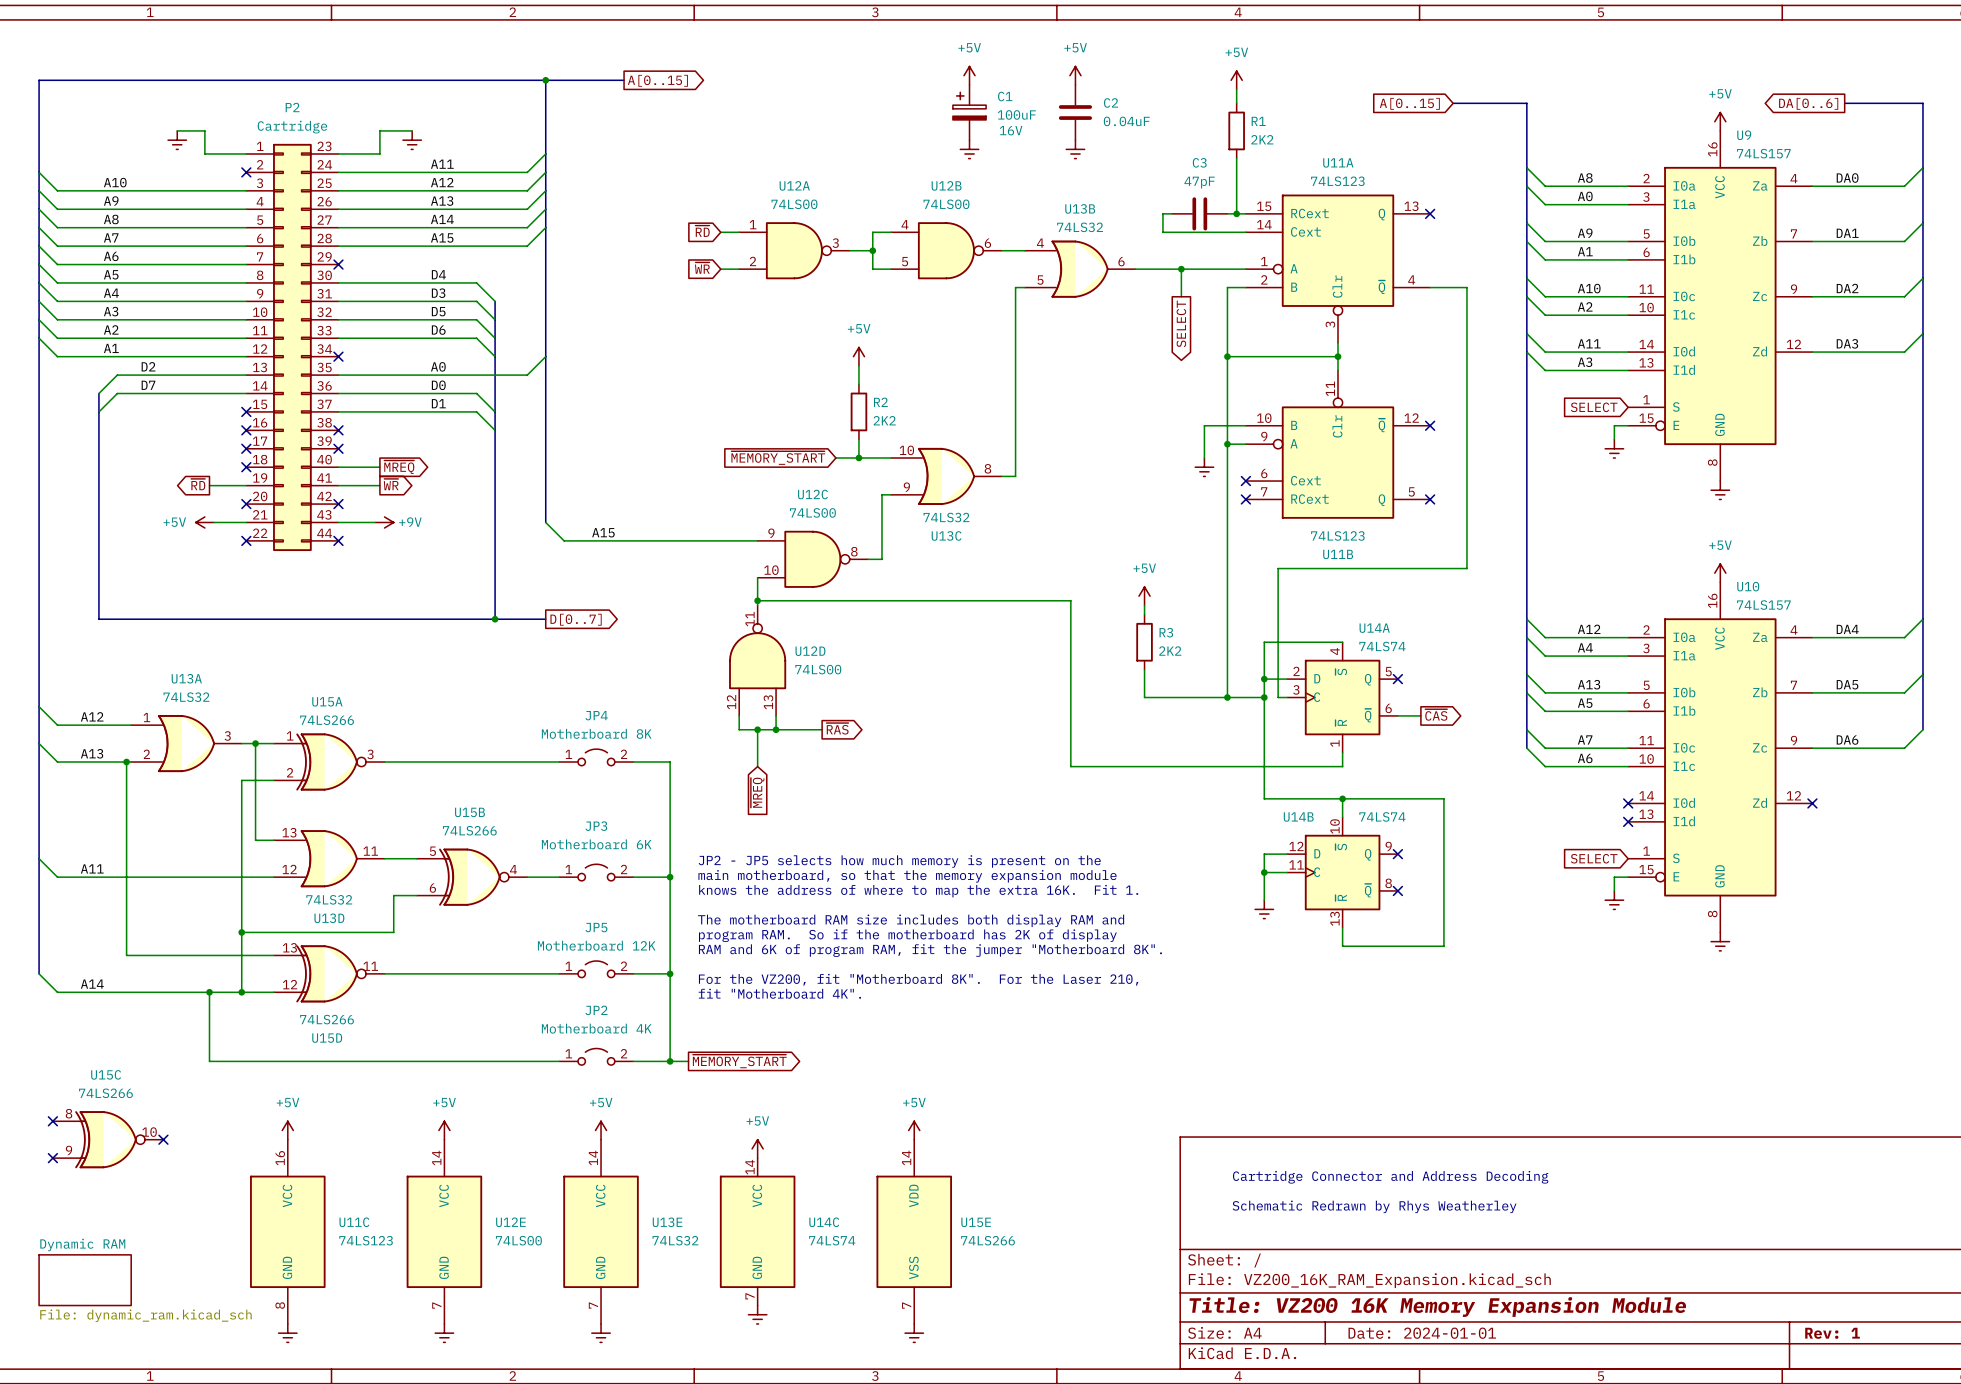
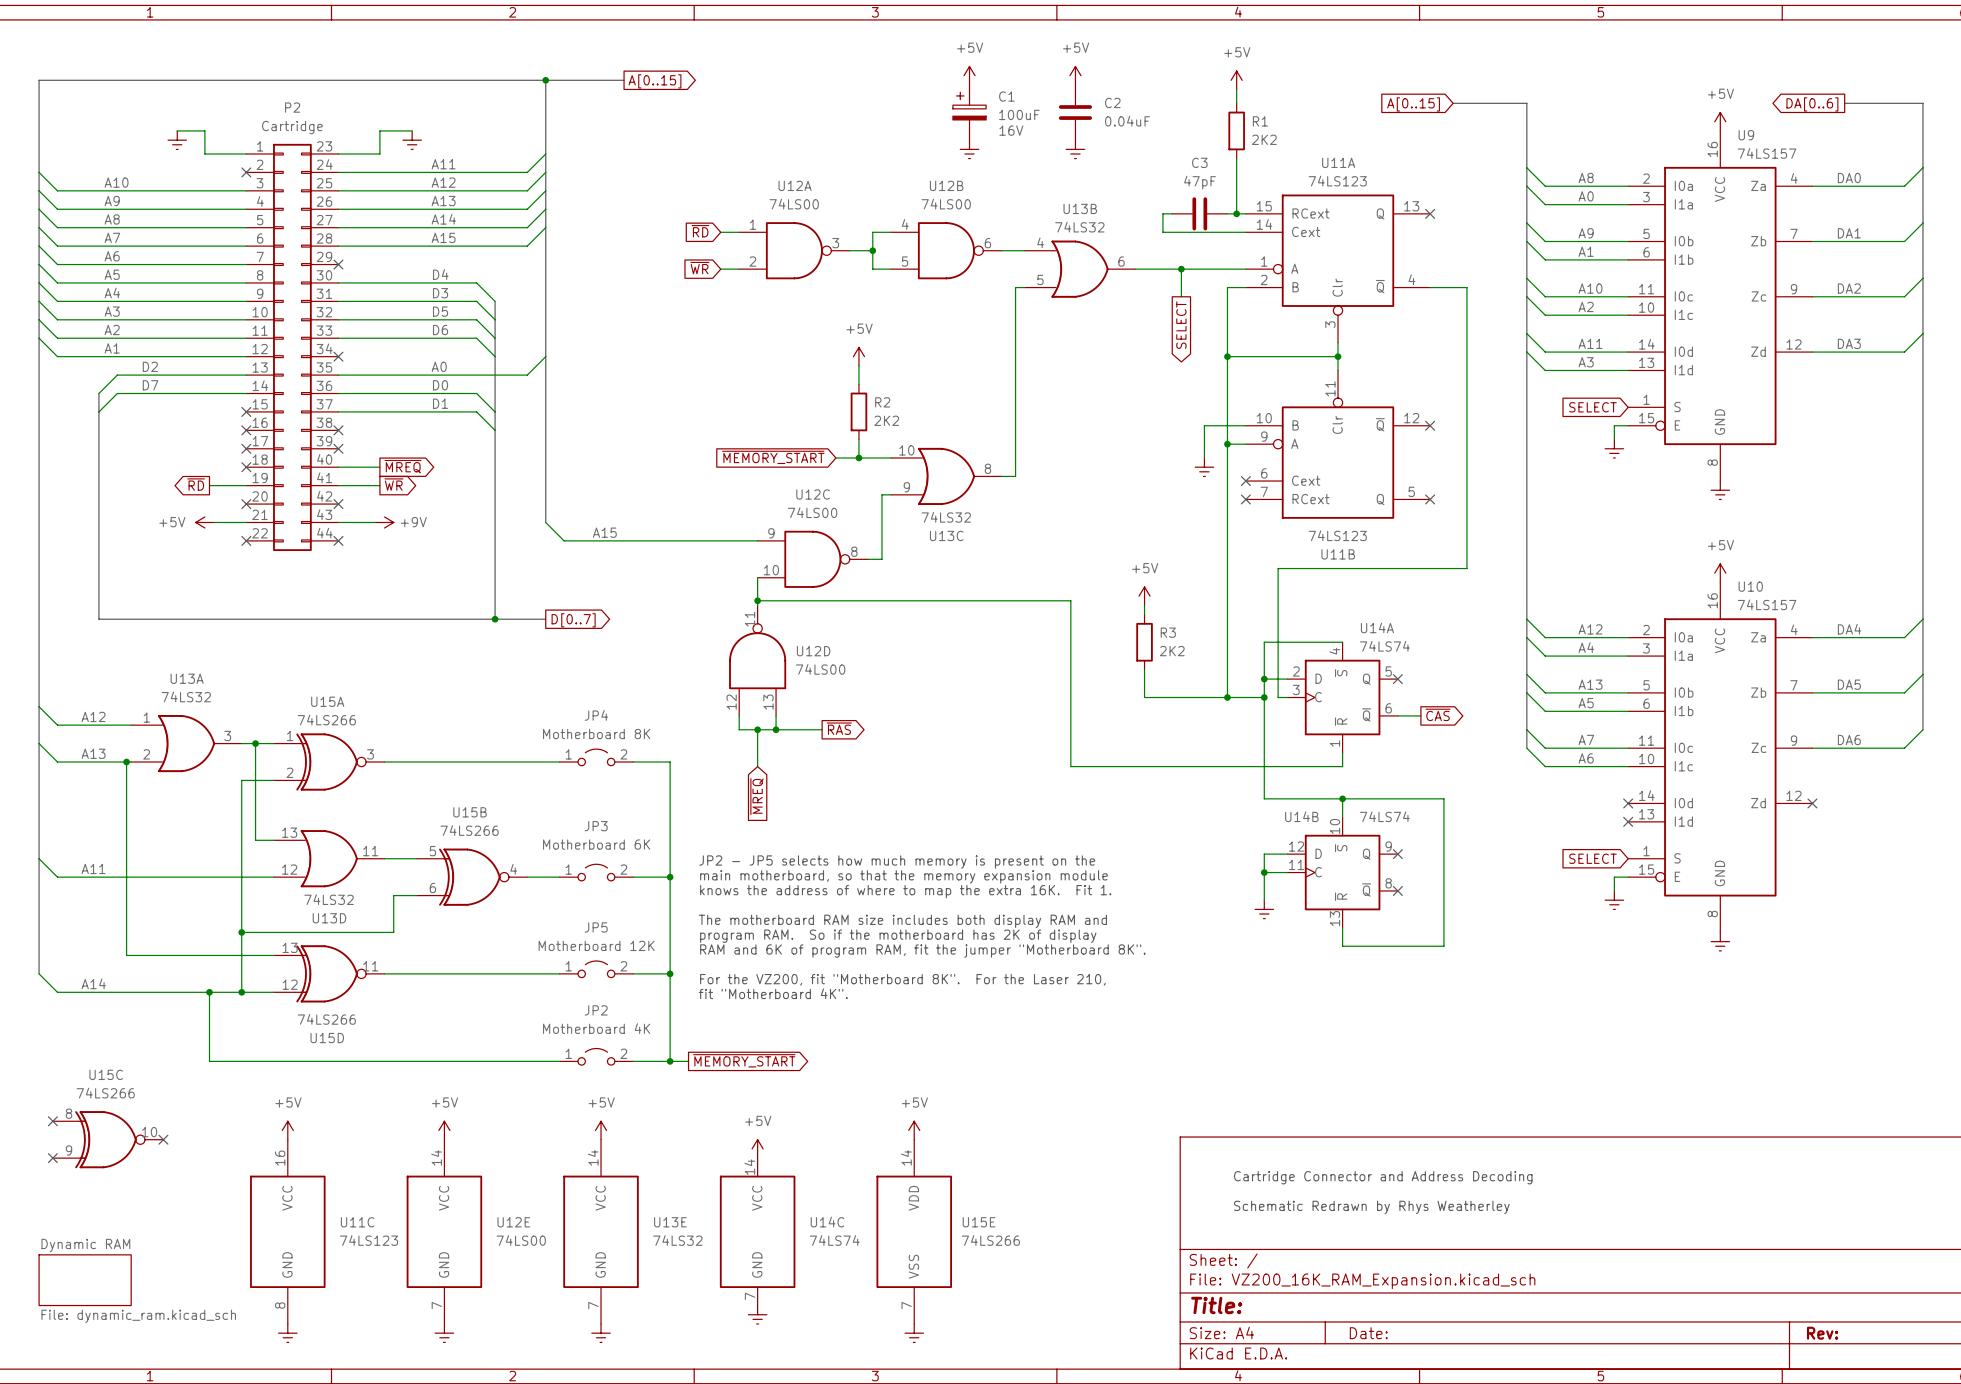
title block: Title: VZ200 16K Memory Expansion Module (1437, 1307) -> Title: (1216, 1305)
title block: Date: 2024-01-01 (1422, 1333) -> Date: (1368, 1333)
title block: Rev: 1 (1832, 1333) -> Rev: (1822, 1333)

